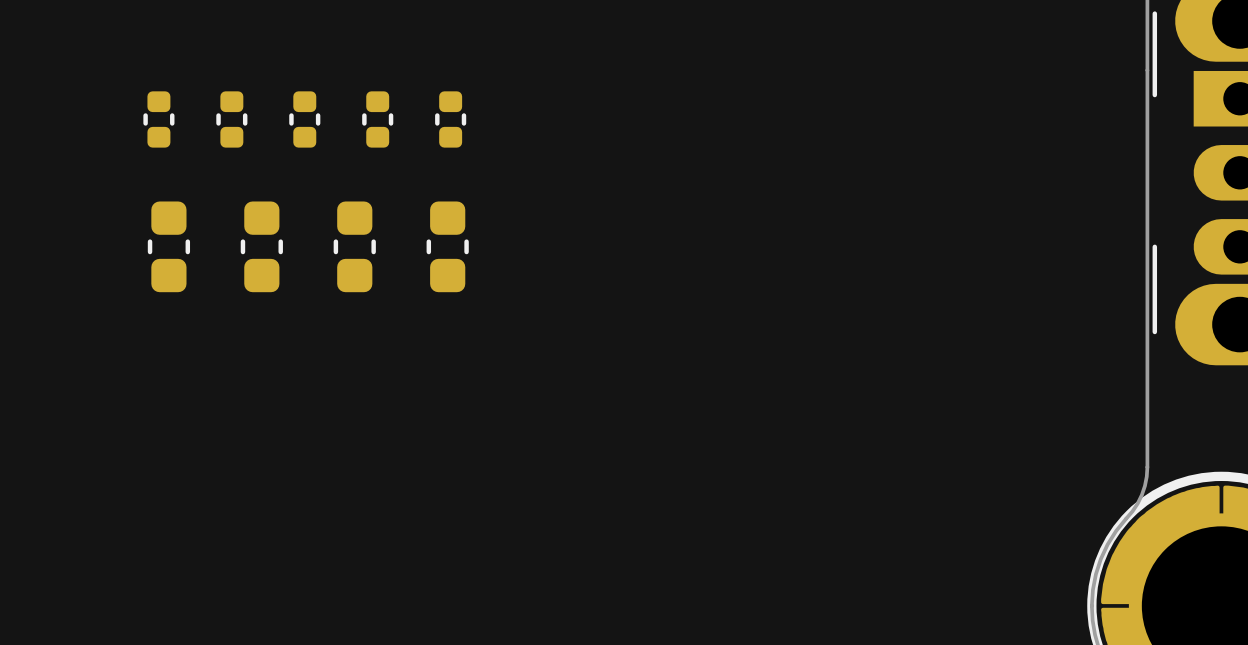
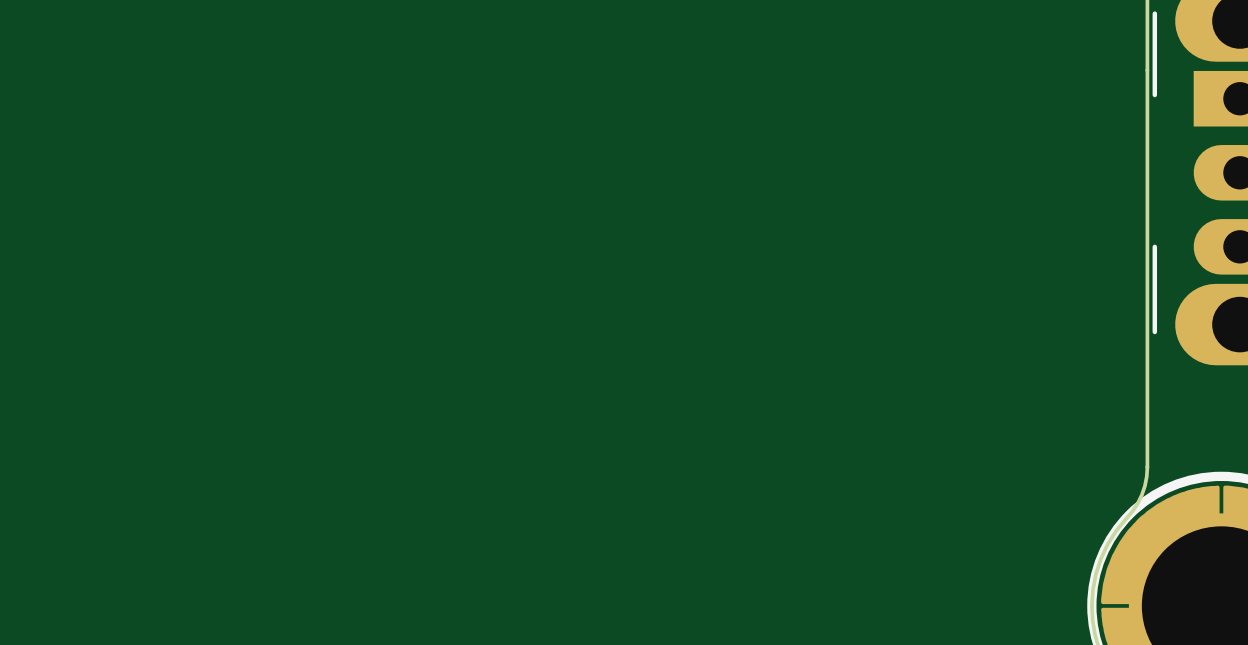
part: (158, 119) -> none
part: (231, 119) -> none
part: (304, 119) -> none
part: (377, 119) -> none
part: (450, 119) -> none
part: (168, 246) -> none
part: (261, 246) -> none
part: (354, 246) -> none
part: (447, 246) -> none

